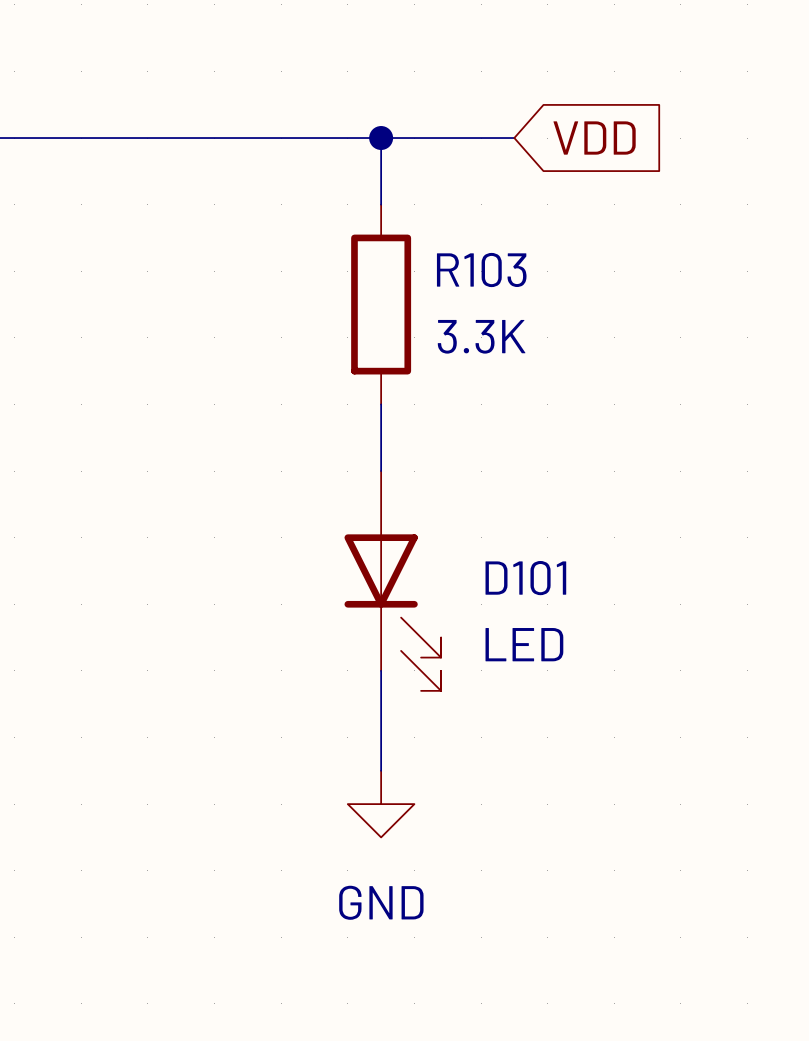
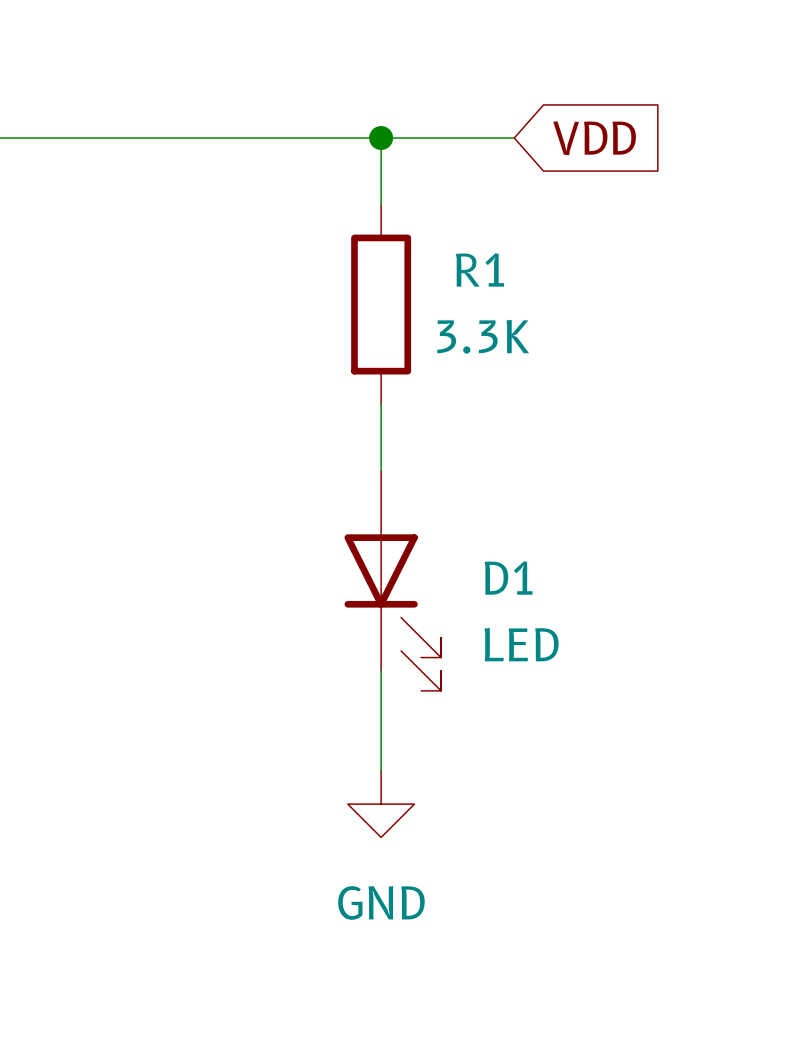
R103 name: R103 (481, 270) -> R1 (479, 269)
D101 name: D101 (525, 578) -> D1 (508, 578)

